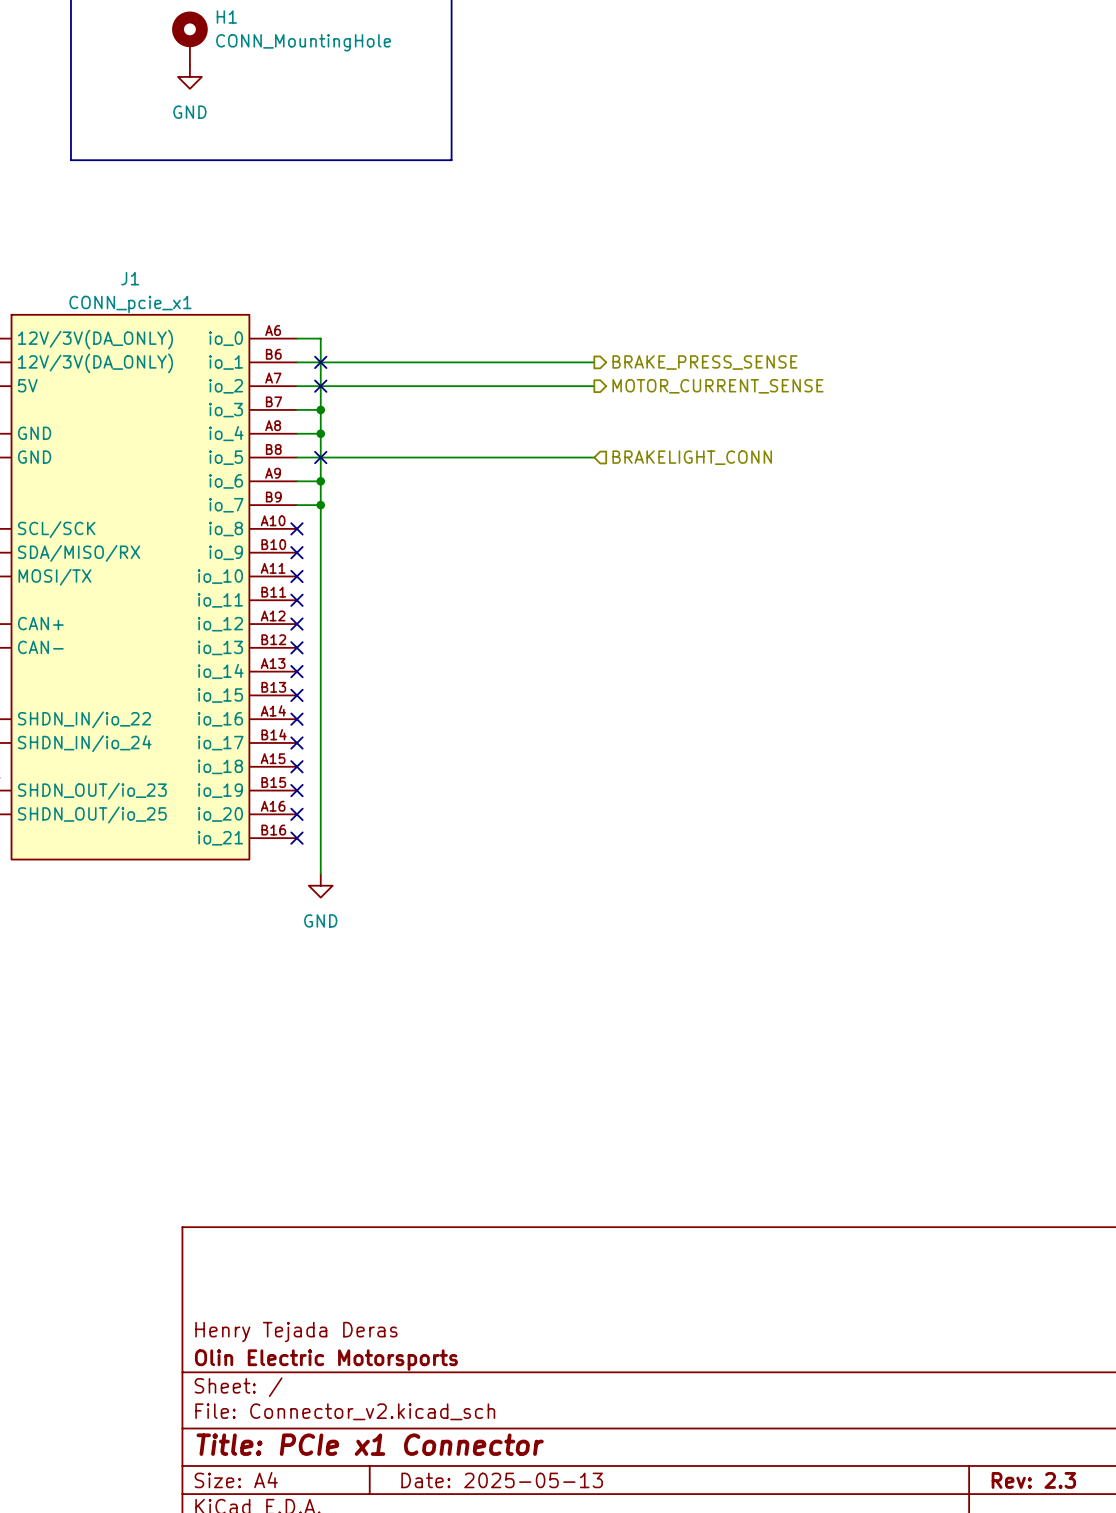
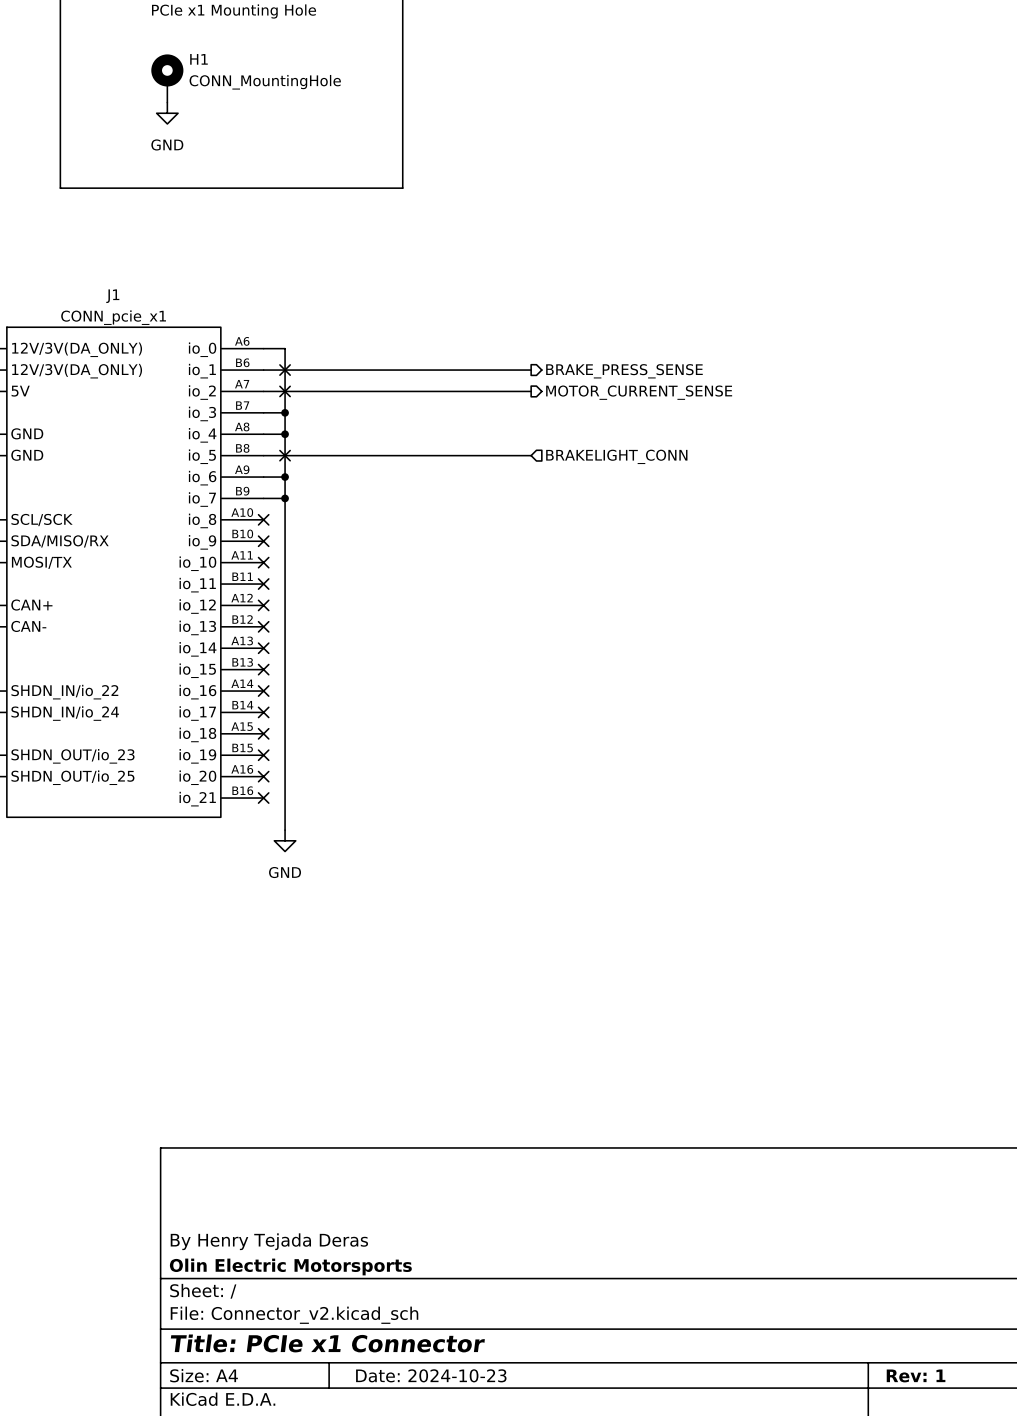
title block: Henry Tejada Deras (296, 1332) -> By Henry Tejada Deras (269, 1241)
title block: Date: 2025-05-13 (502, 1480) -> Date: 2024-10-23 (431, 1375)
title block: Rev: 2.3 (1033, 1480) -> Rev: 1 (916, 1375)

